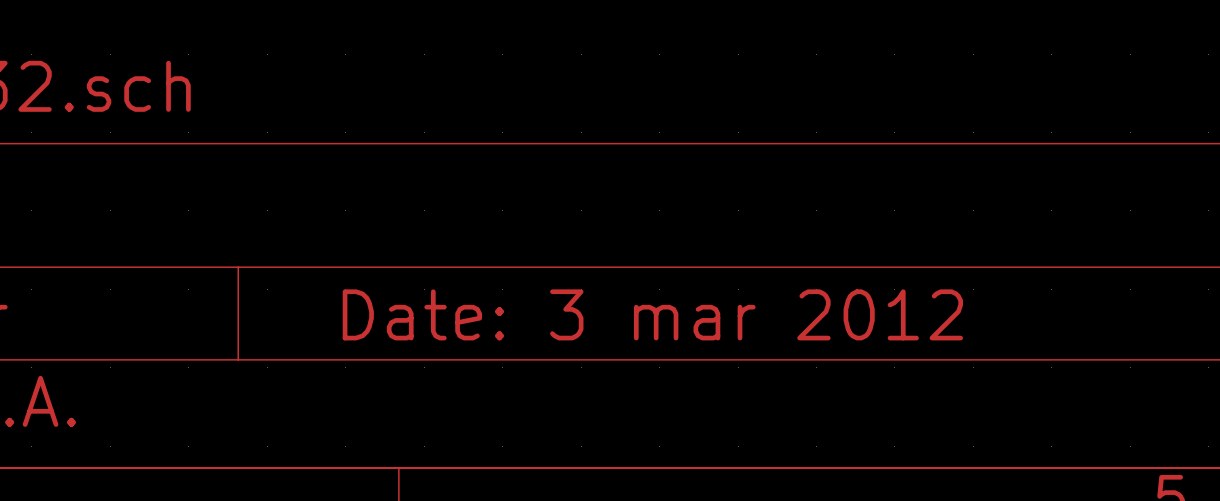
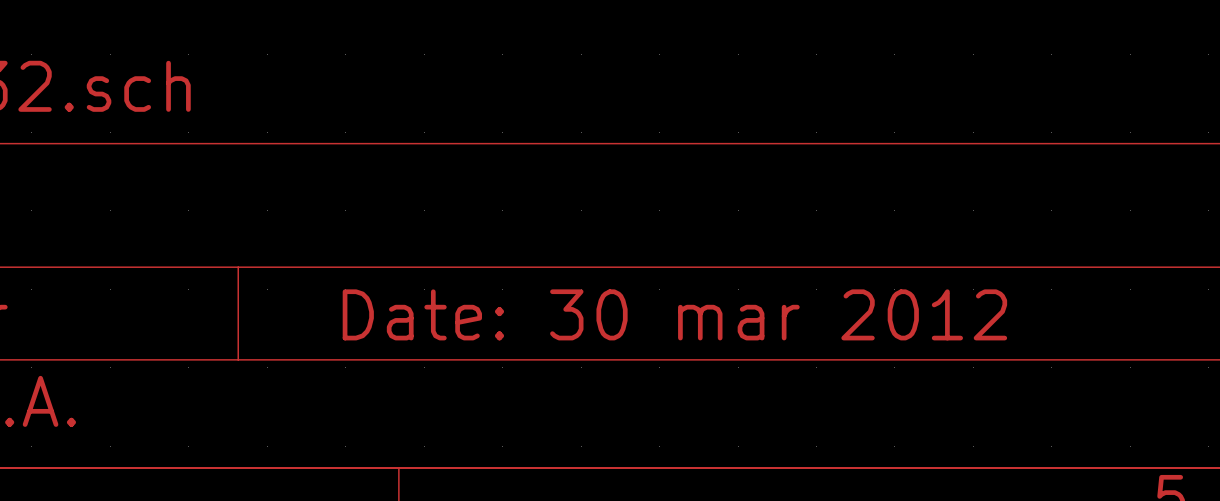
title block: Date: 3 mar 2012 (652, 314) -> Date: 30 mar 2012 (674, 314)

